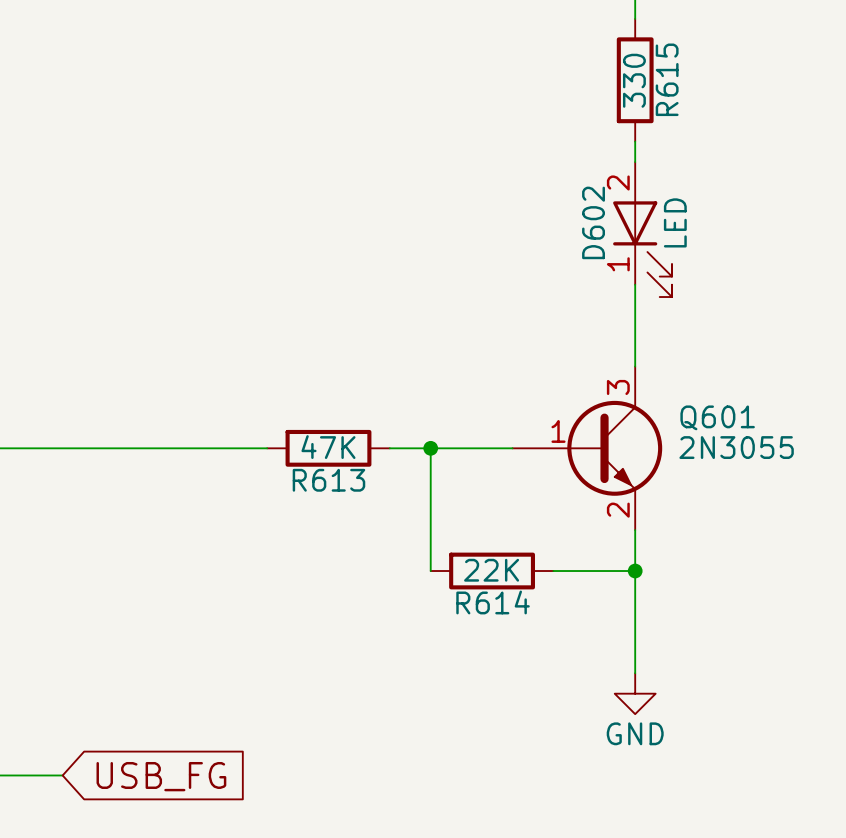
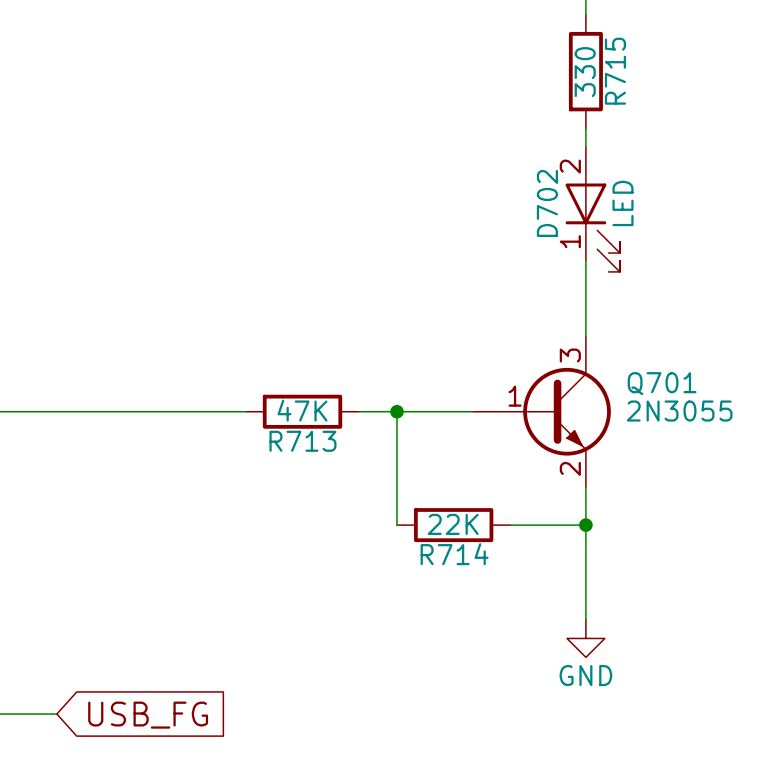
R615 name: R615 (667, 79) -> R715 (615, 71)
D602 name: D602 (593, 222) -> D702 (547, 203)
Q601 name: Q601 (717, 417) -> Q701 (662, 383)
R613 name: R613 (328, 480) -> R713 (302, 441)
R614 name: R614 (493, 602) -> R714 (454, 554)

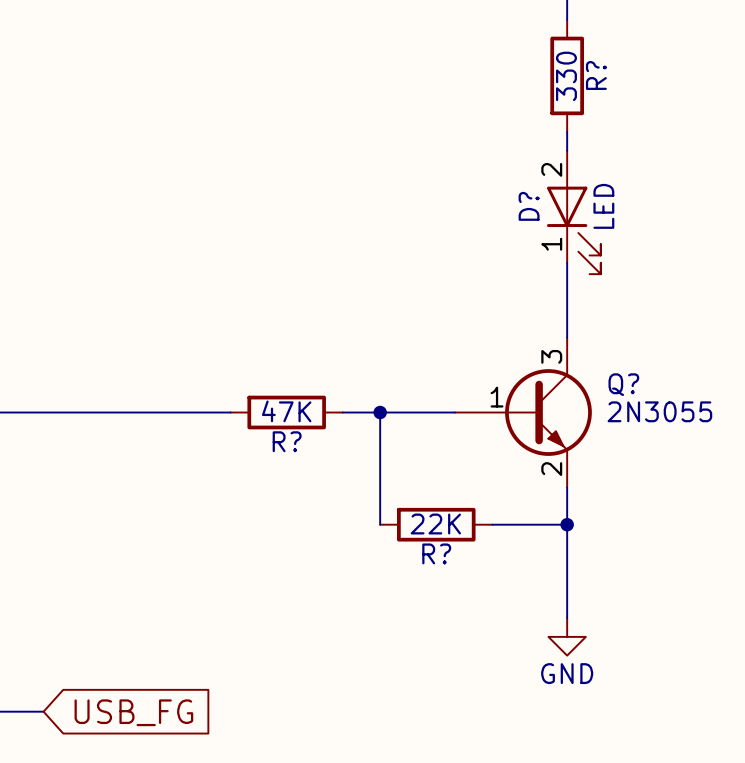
R715 name: R715 (615, 71) -> R? (596, 75)
D702 name: D702 (547, 203) -> D? (529, 206)
Q701 name: Q701 (662, 383) -> Q? (623, 384)
R713 name: R713 (302, 441) -> R? (287, 441)
R714 name: R714 (454, 554) -> R? (436, 553)

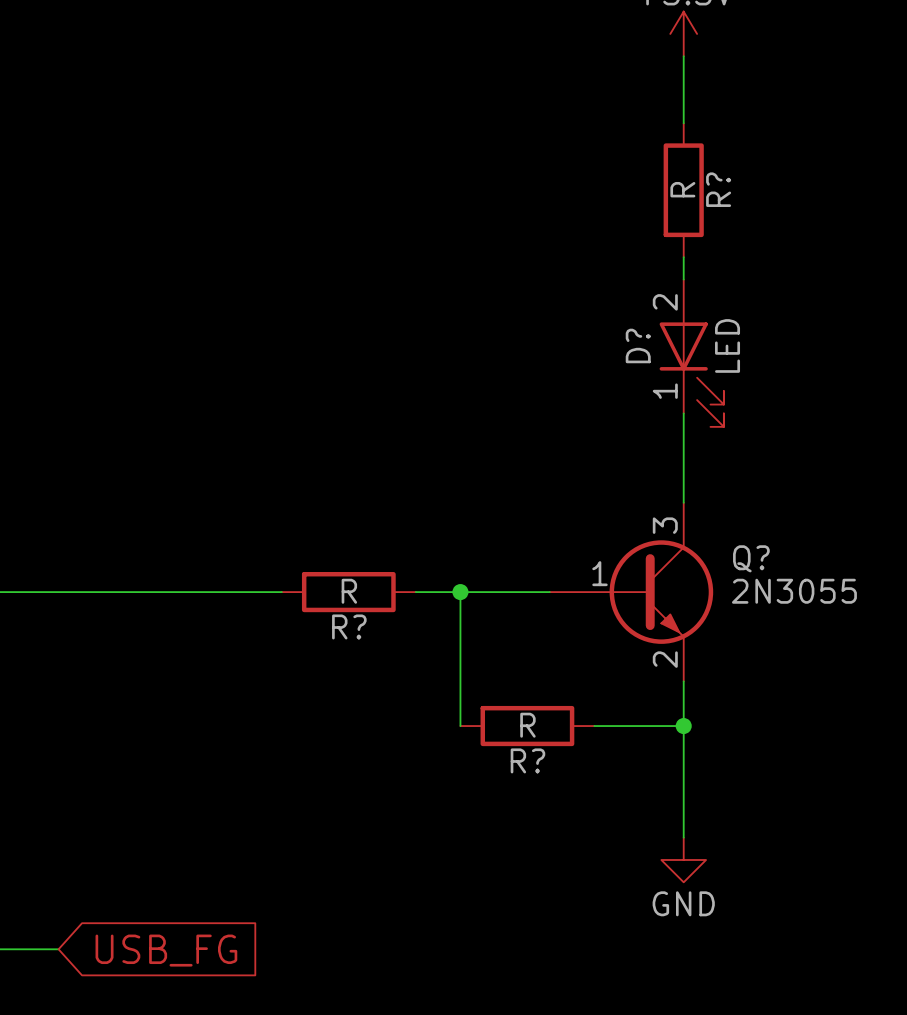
R? value: 330 (566, 76) -> R (682, 189)
R? value: 47K (286, 411) -> R (349, 591)
R? value: 22K (435, 524) -> R (527, 725)

